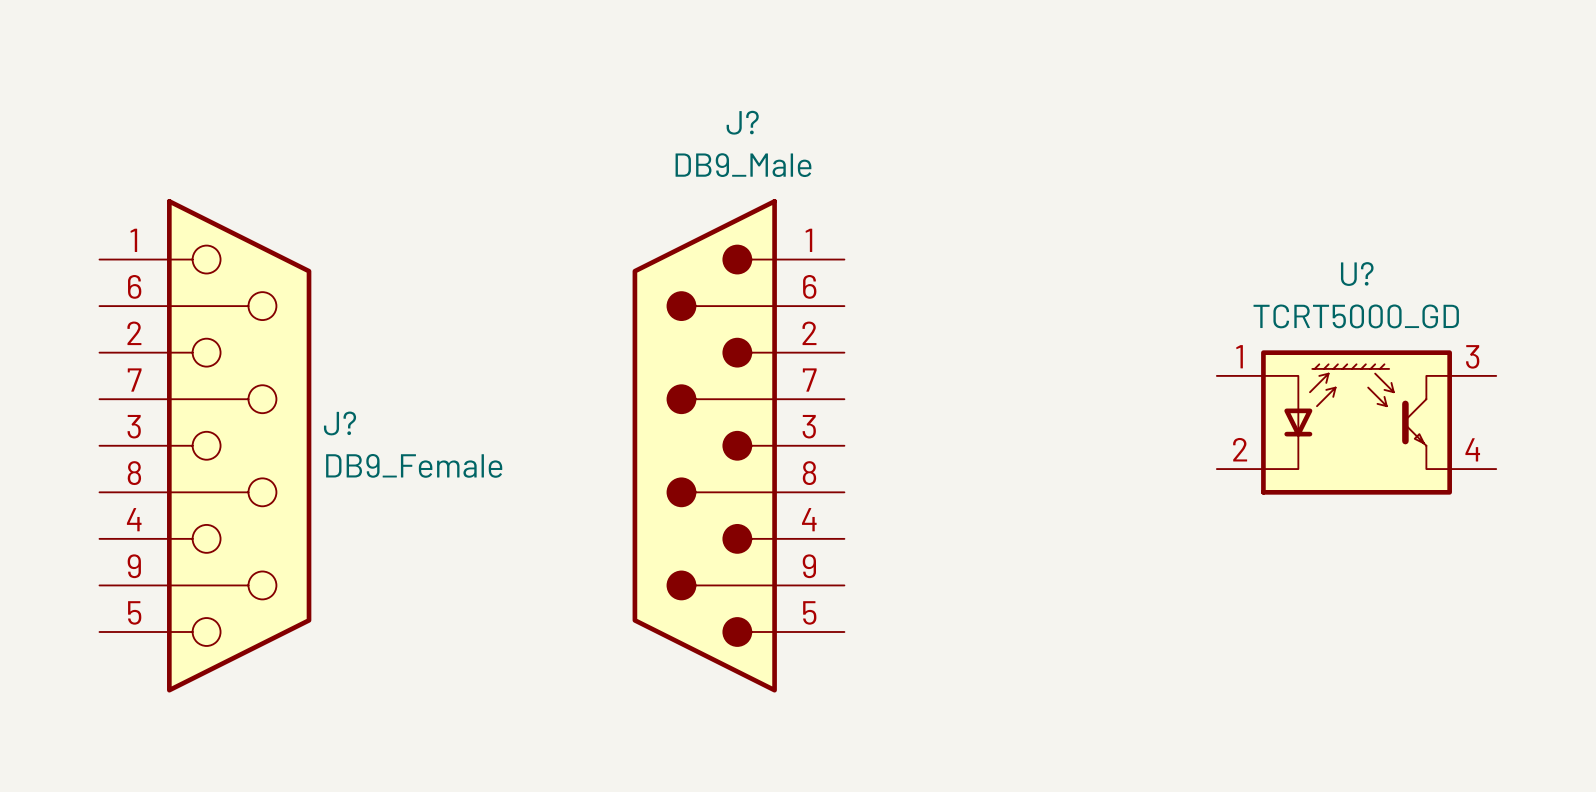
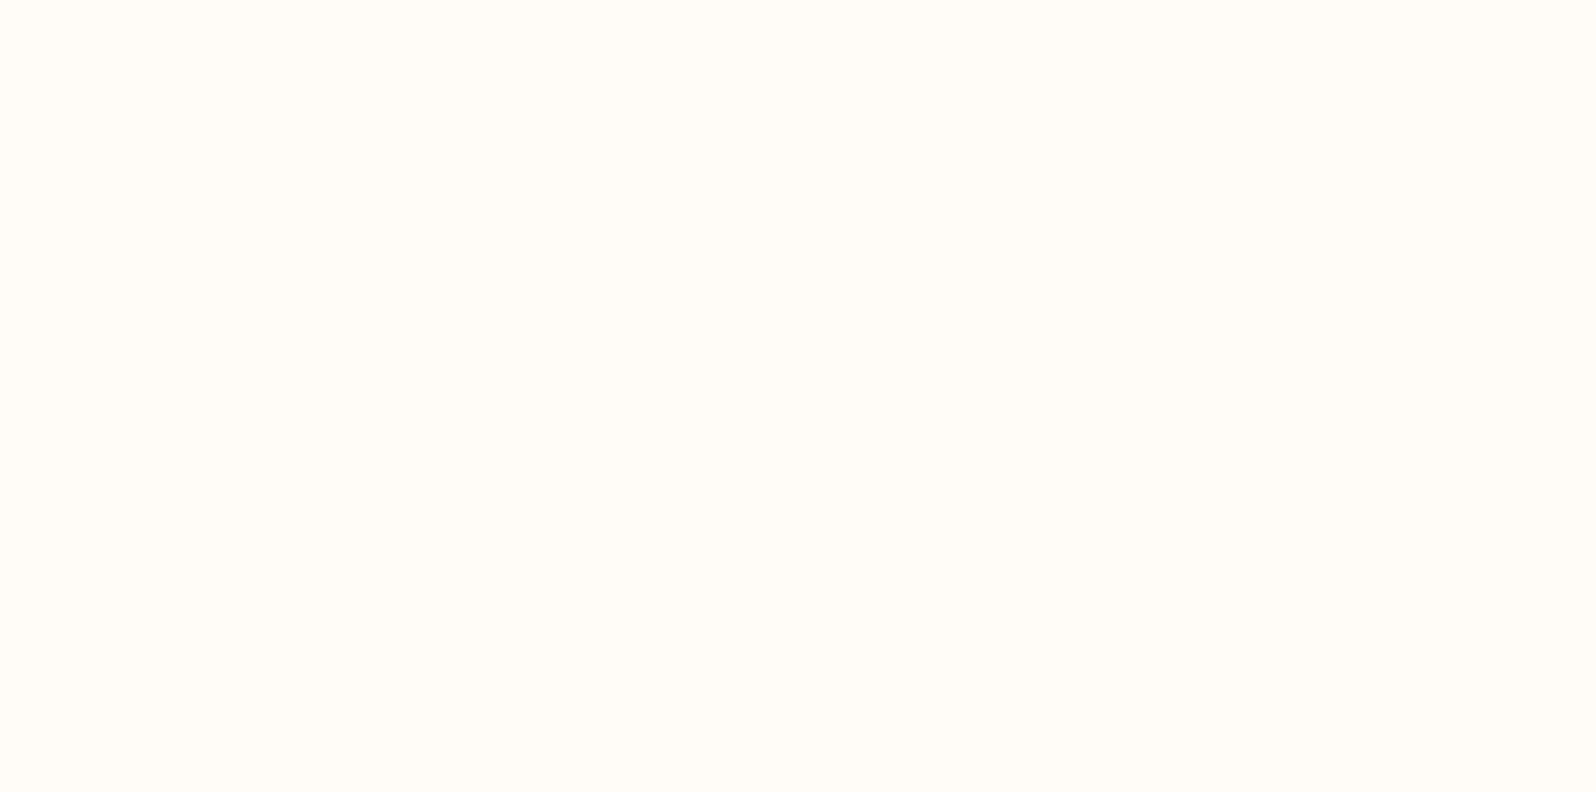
U?: TCRT5000_GD (1356, 422) -> none
J?: DB9_Female (205, 445) -> none
J?: DB9_Male (738, 445) -> none

